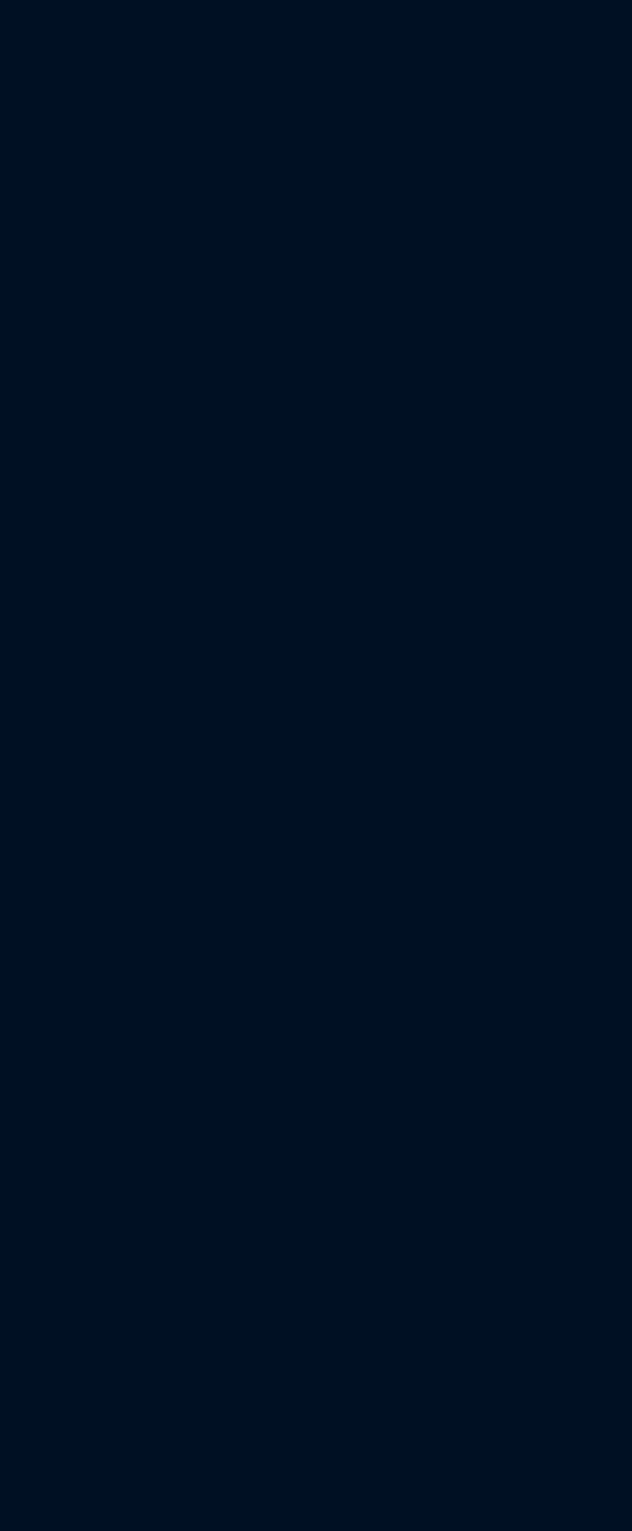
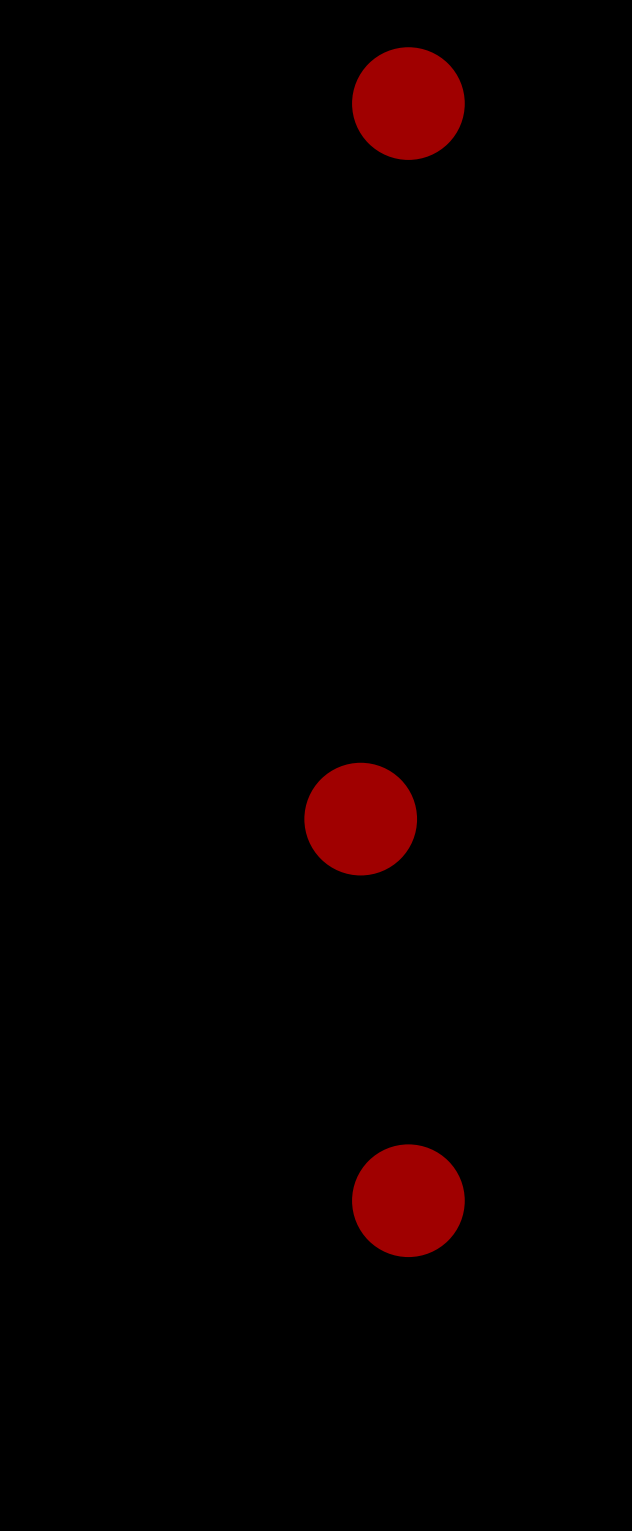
part: none -> (408, 103)
part: none -> (360, 819)
part: none -> (408, 1200)

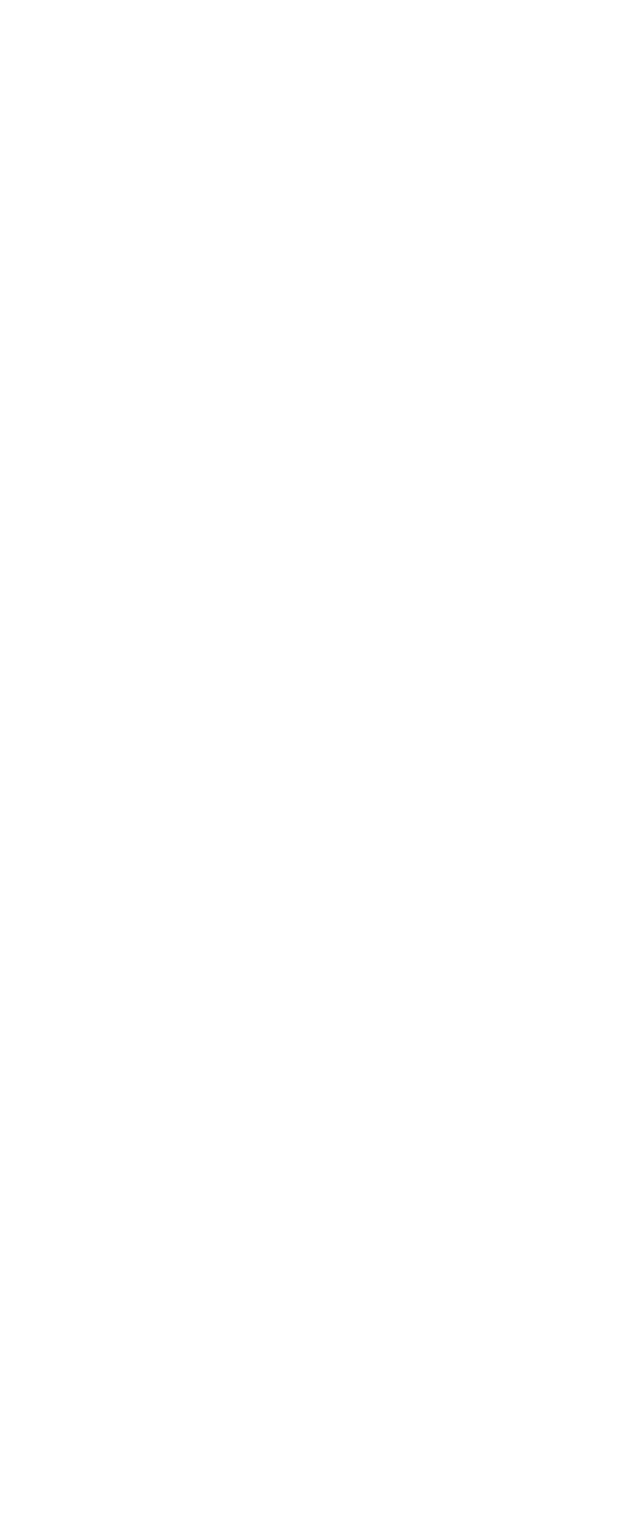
part: (408, 103) -> none
part: (360, 819) -> none
part: (408, 1200) -> none

